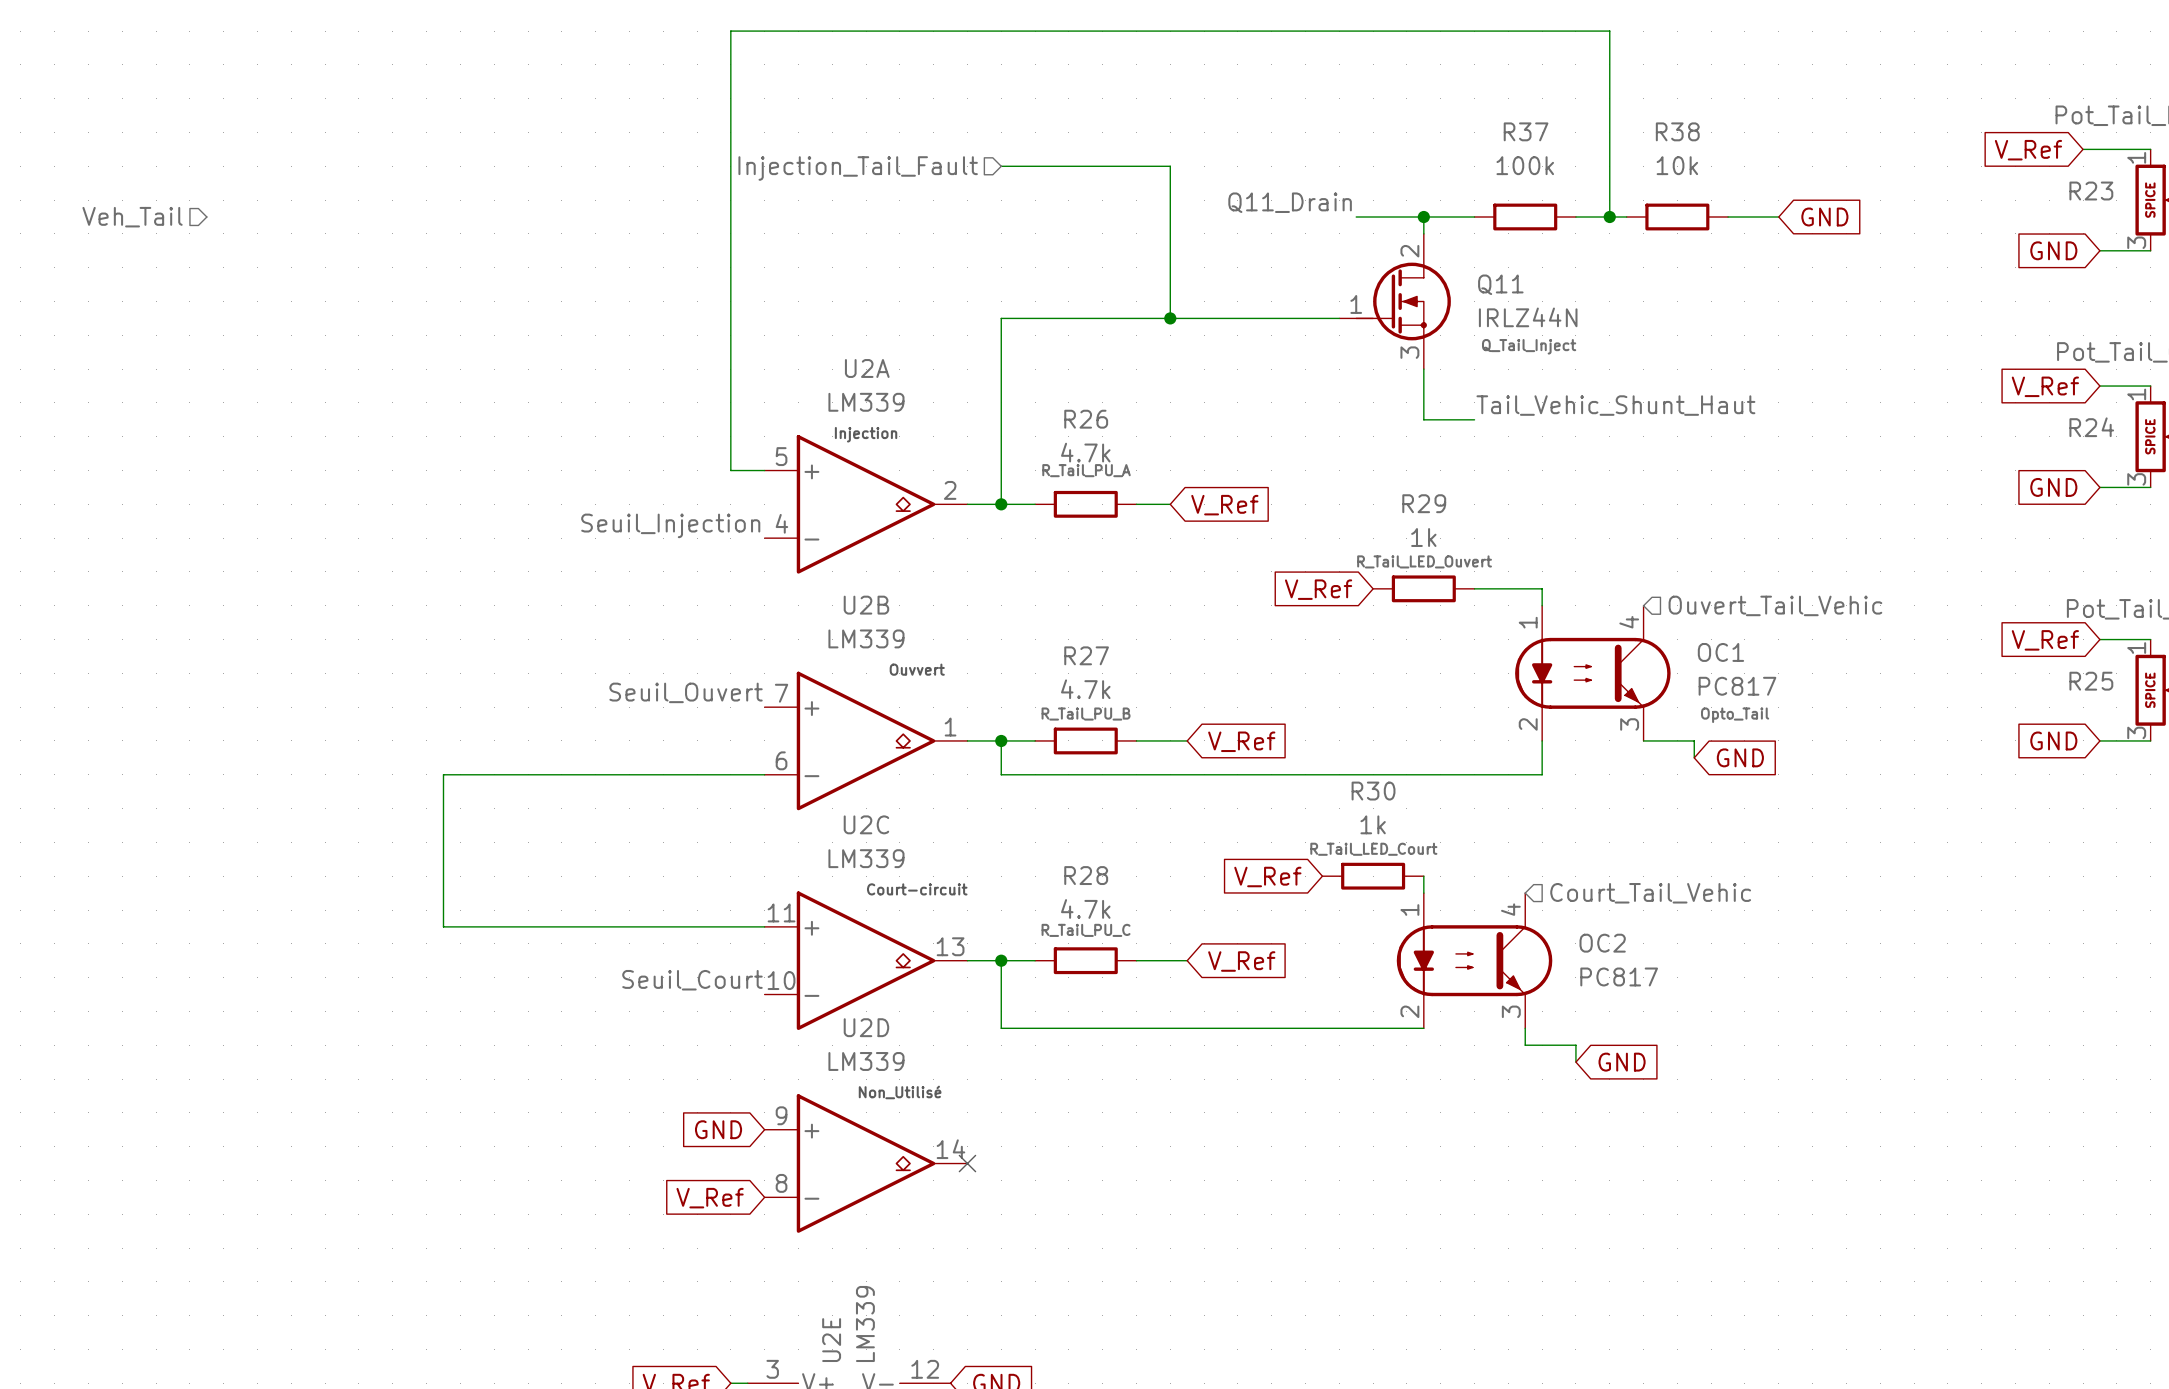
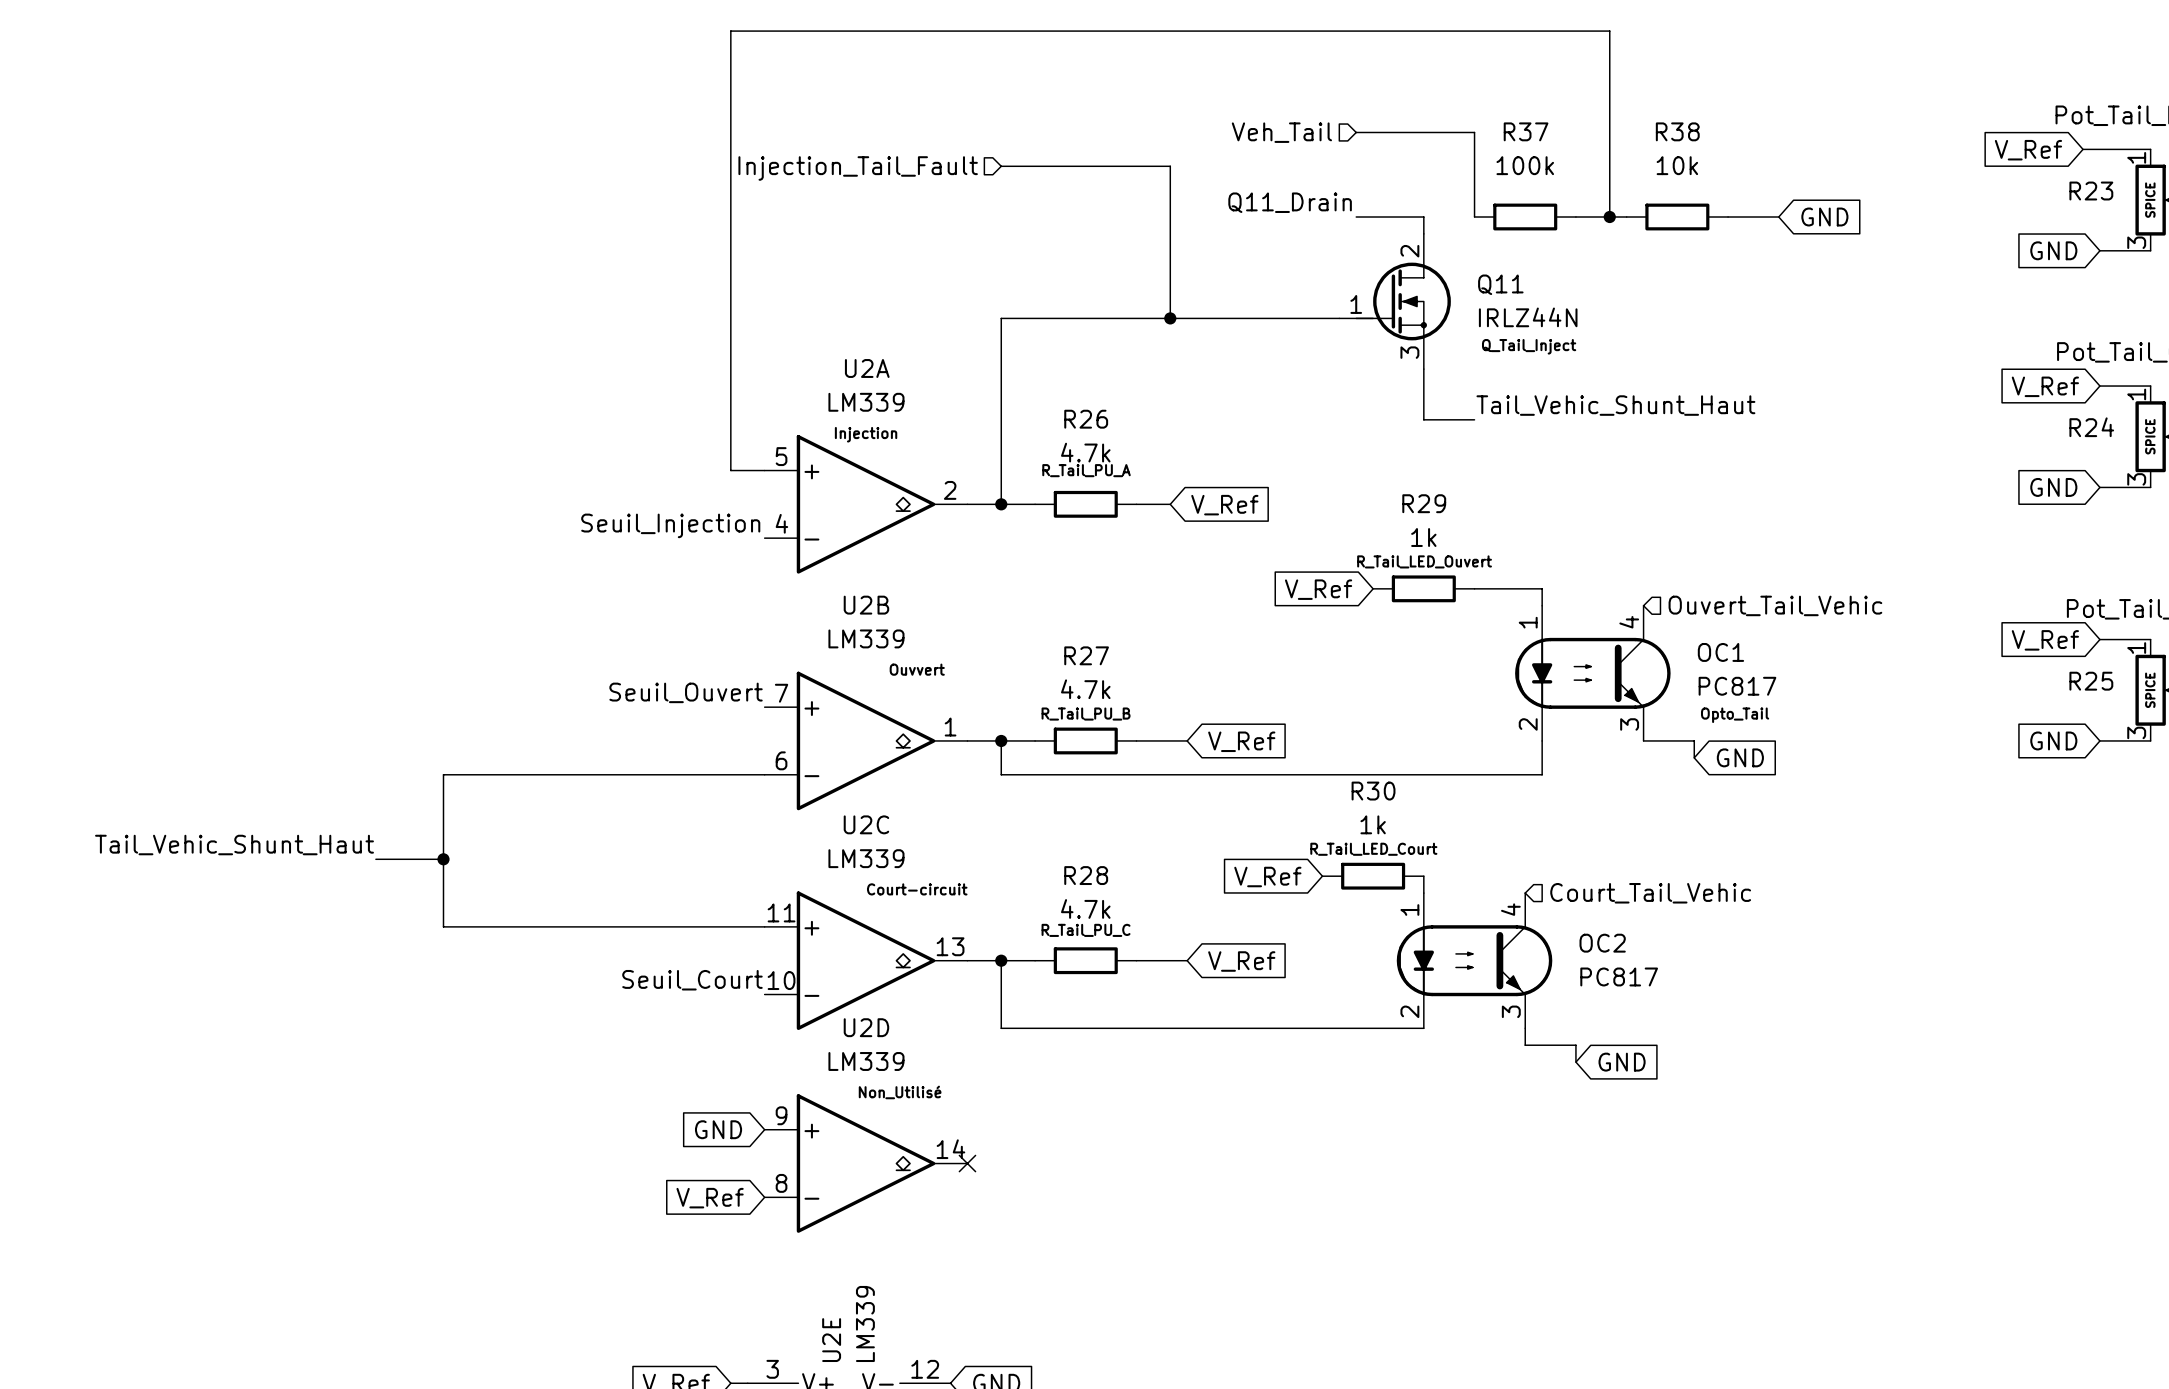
hierarchical label: none -> Veh_Tail (1281, 132)
hierarchical label: Veh_Tail (132, 217) -> none
wire: (1423, 217) (1474, 217) -> (1356, 132) (1474, 132) (1474, 217)
junction: (1423, 217) -> none
label: none -> Tail_Vehic_Shunt_Haut (234, 845)
wire: none -> (375, 859) (443, 859)
junction: none -> (443, 859)

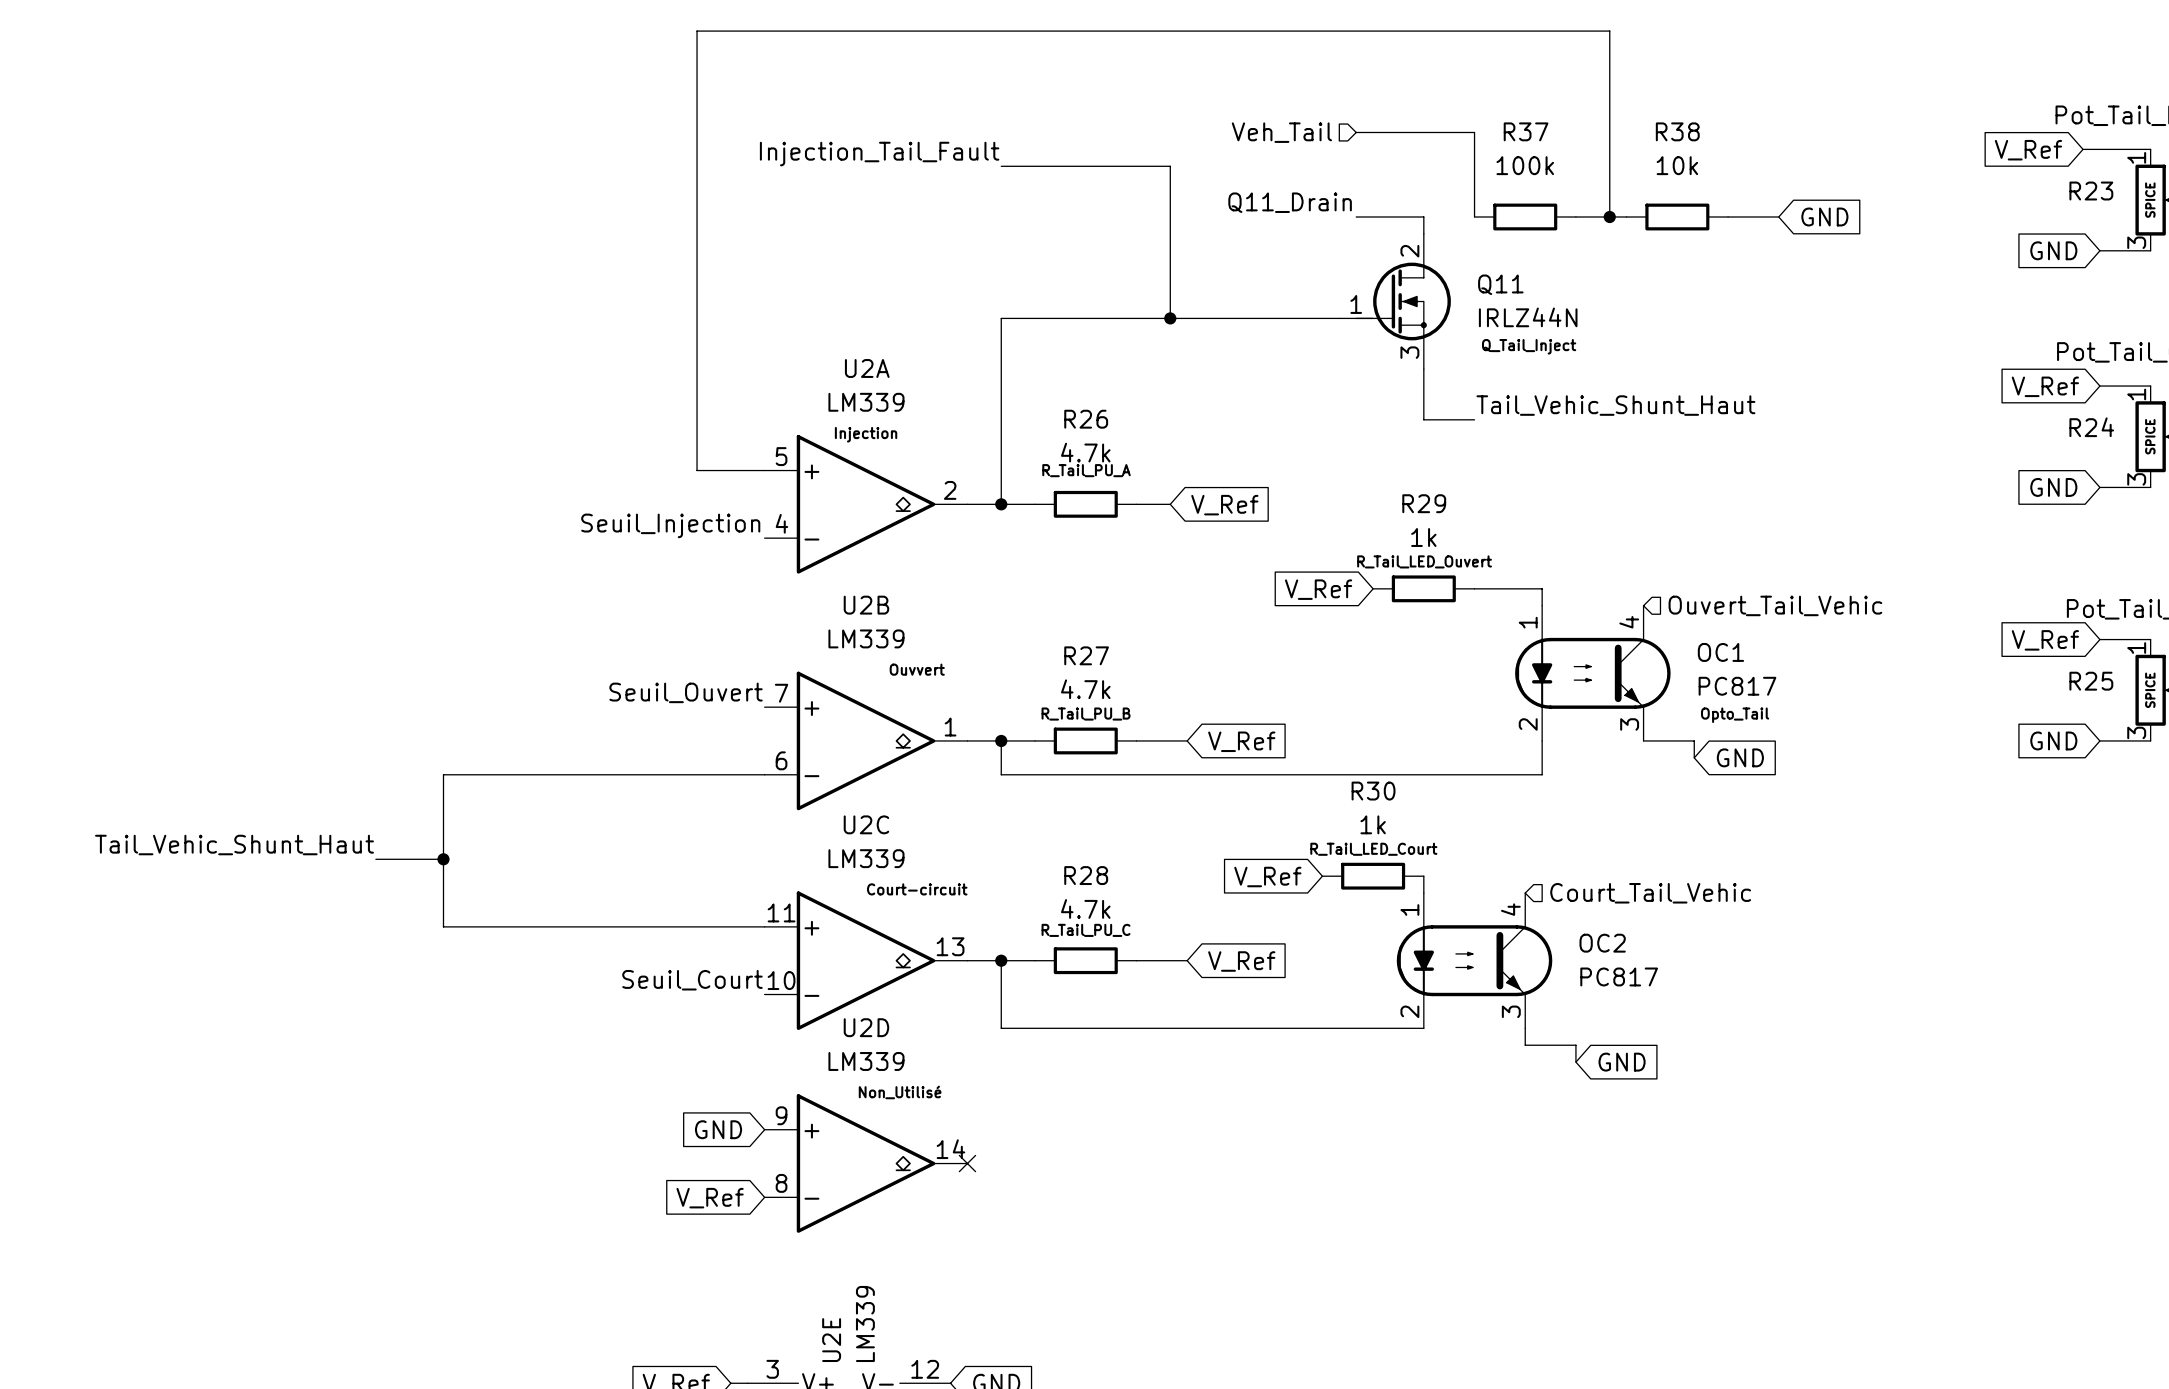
wire: (730, 31) (730, 470) -> (730, 31) (697, 31) (697, 470) (730, 470)
label: none -> Injection_Tail_Fault (879, 154)
hierarchical label: Injection_Tail_Fault (858, 168) -> none

